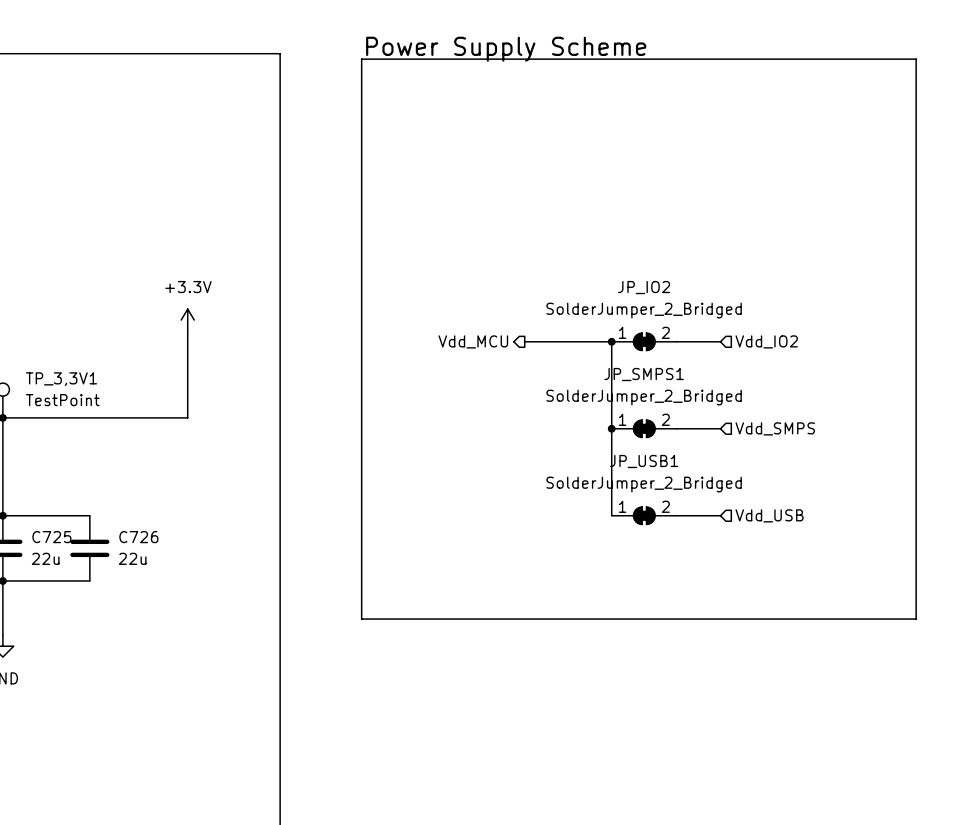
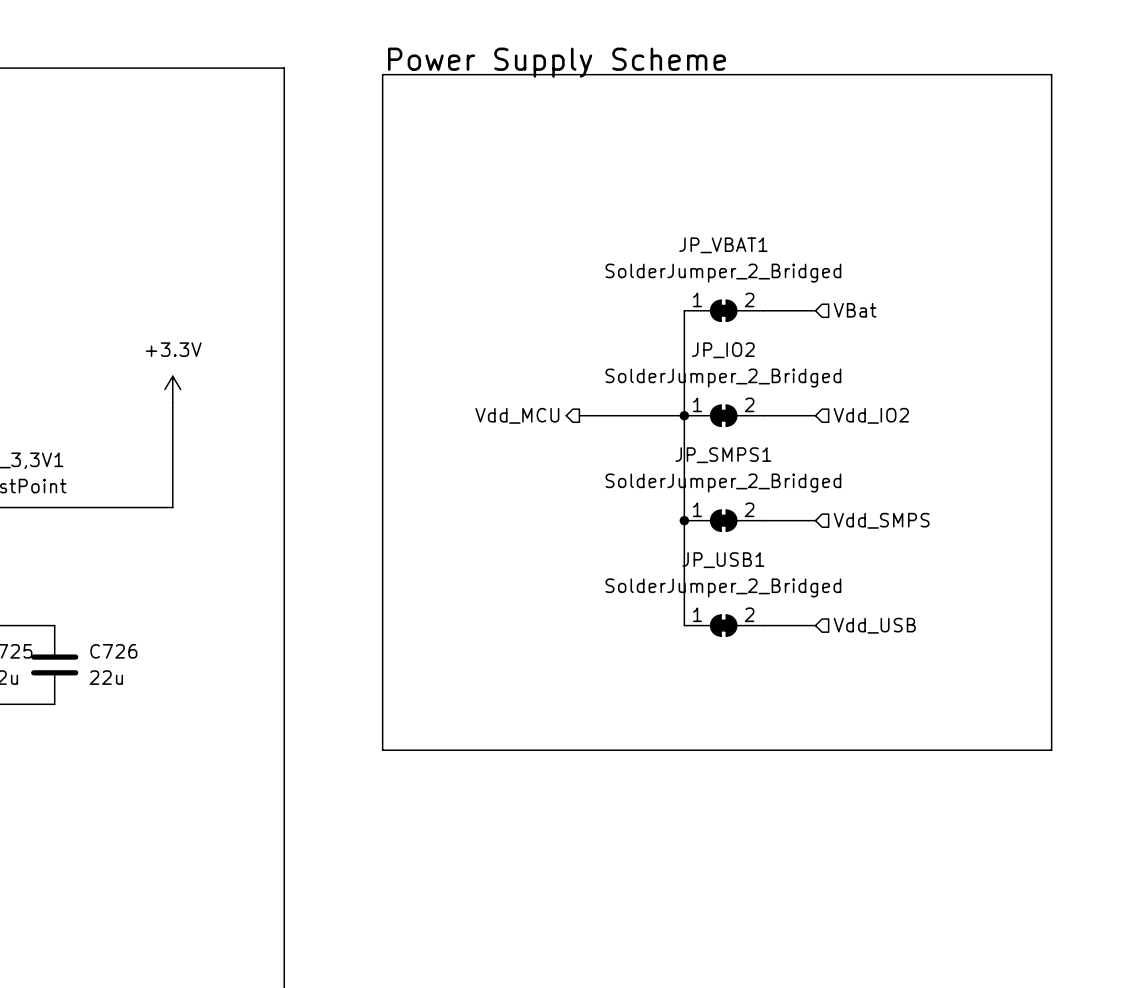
wire: none -> (684, 310) (684, 415)
JP_VBAT1: none -> SolderJumper_2_Bridged (723, 310)
wire: none -> (763, 310) (815, 310)
hierarchical label: none -> VBat (855, 310)

